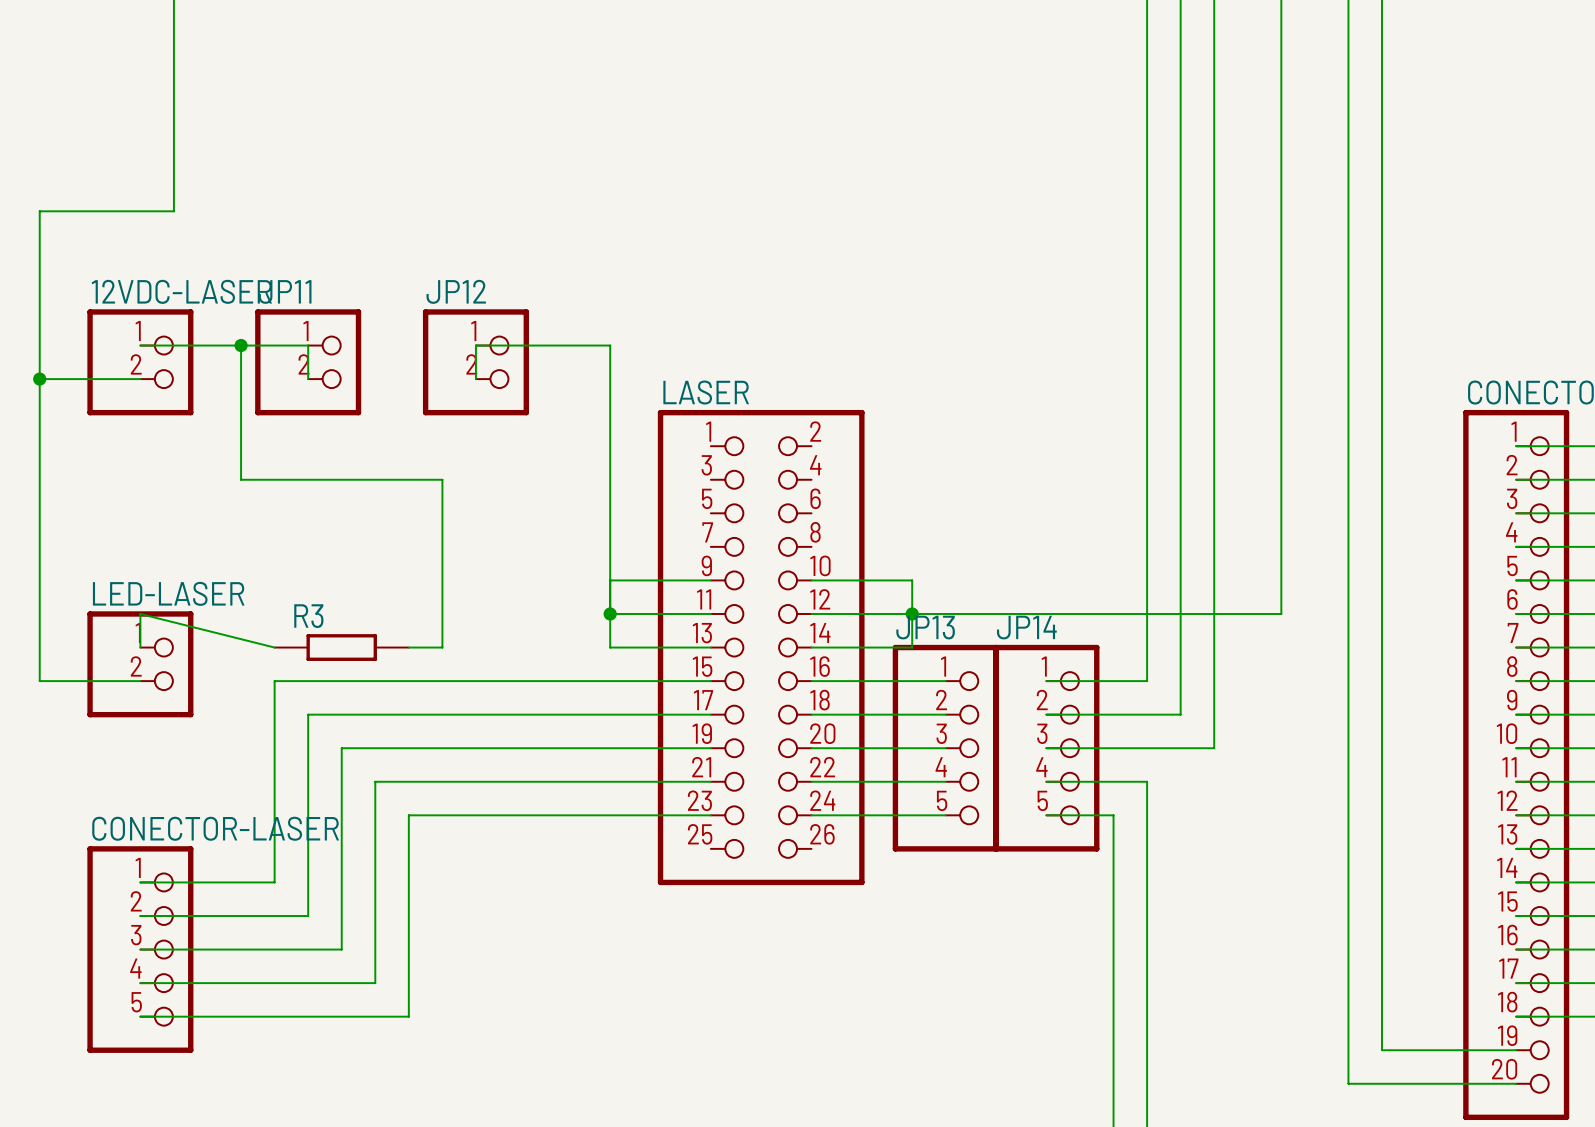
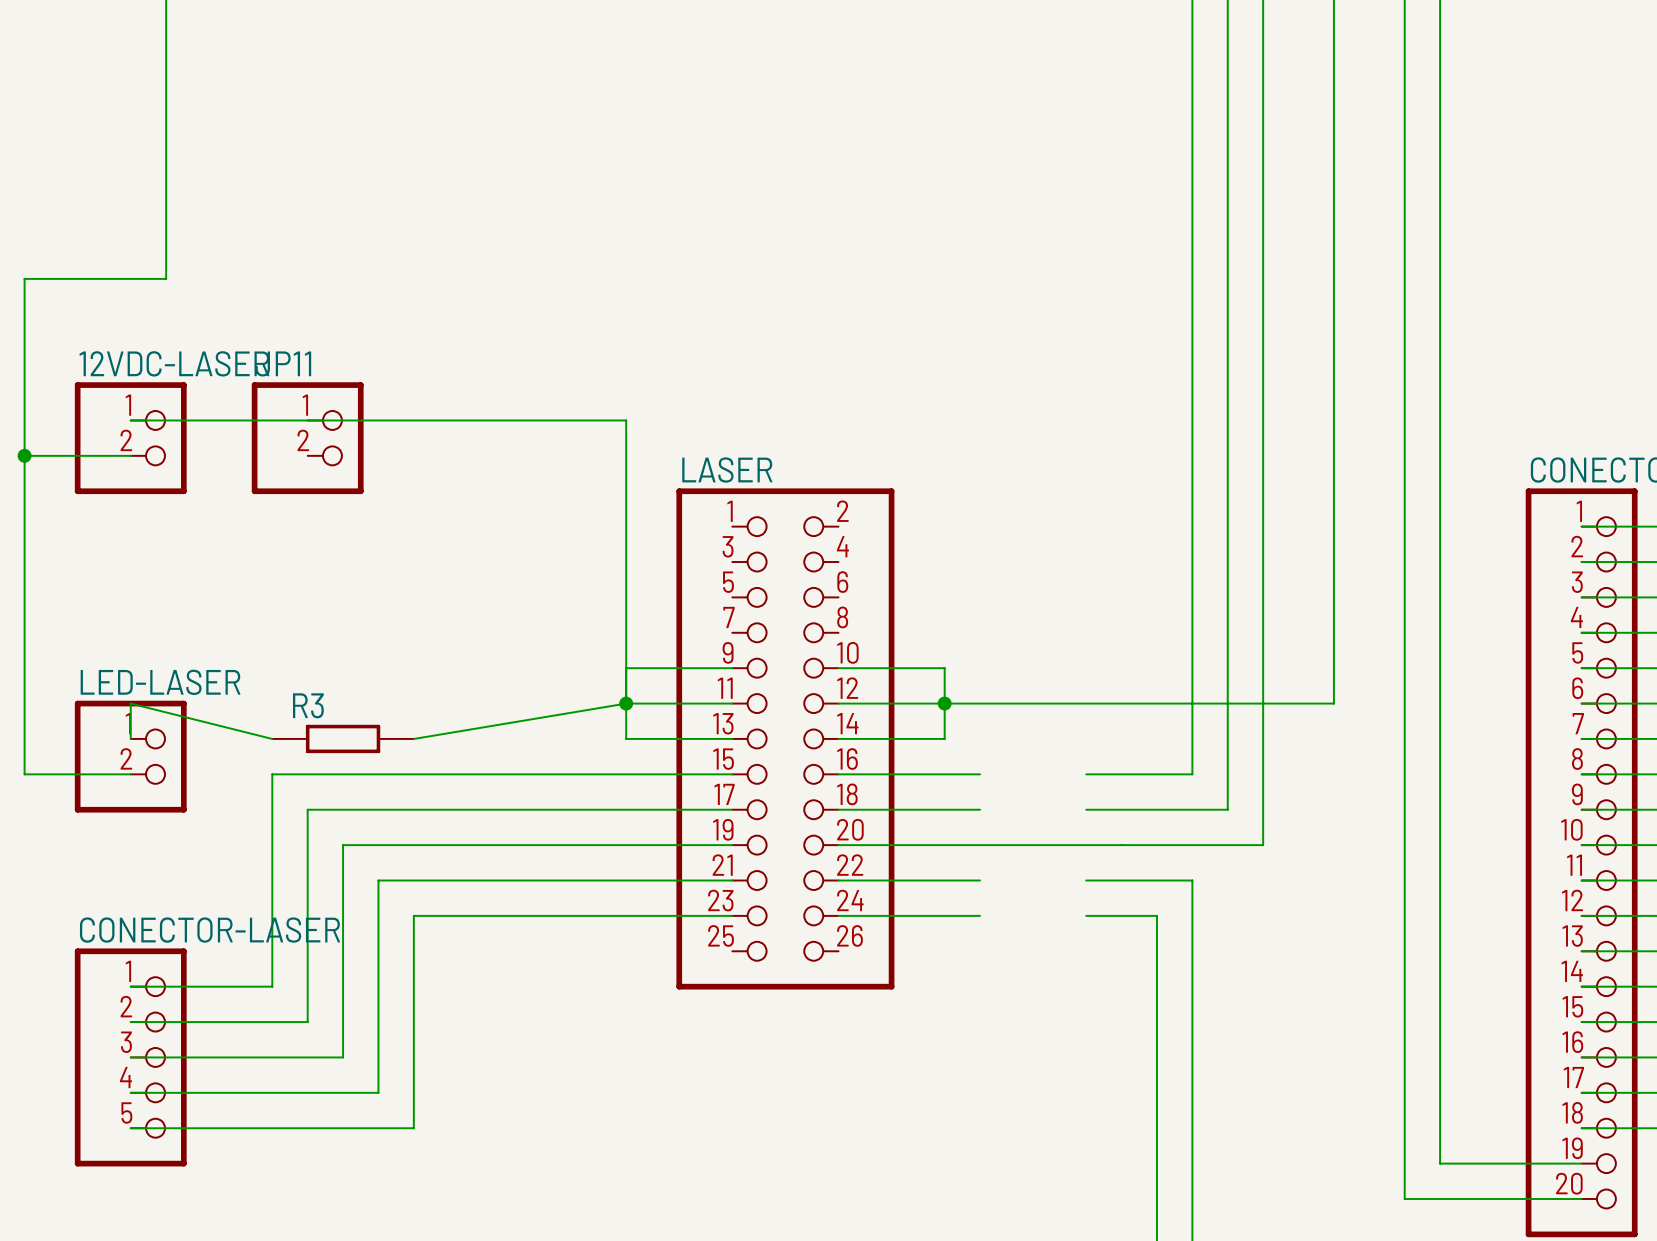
wire: (241, 345) (241, 479) (442, 479) (442, 647) (408, 647) -> (626, 703) (413, 738)
junction: (241, 345) -> none
wire: (308, 345) (308, 379) -> (307, 420) (484, 420)
wire: (475, 345) (475, 379) -> none
JP12: (475, 362) -> none
wire: none -> (980, 845) (1086, 845)
JP13: (945, 748) -> none
JP14: (1046, 748) -> none

